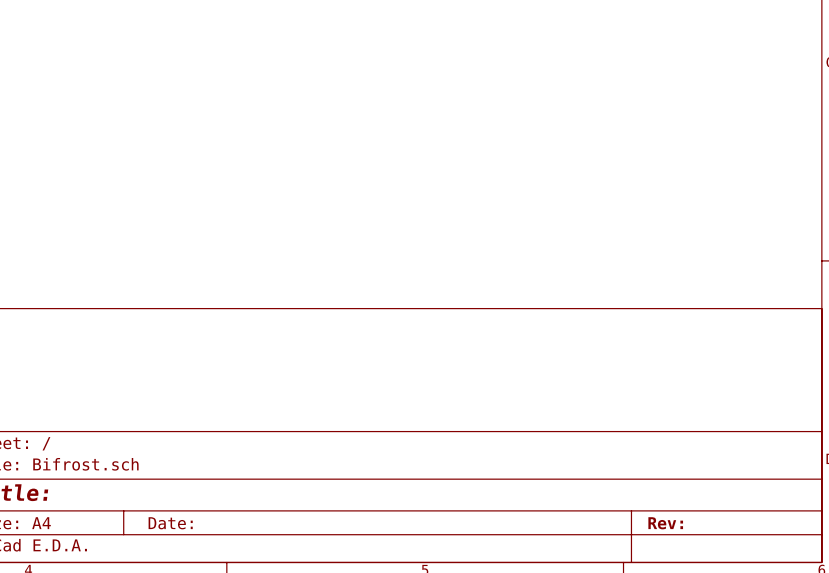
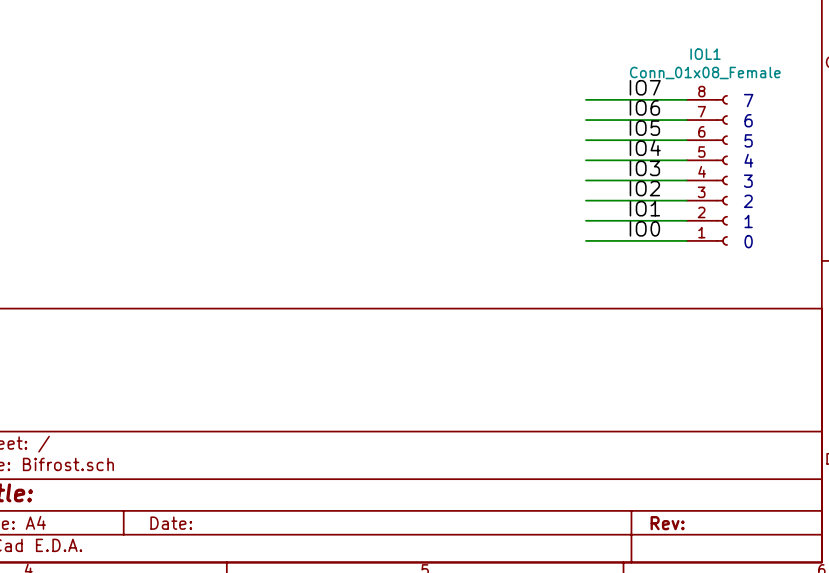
label: none -> IO7 (645, 87)
wire: none -> (585, 99) (686, 99)
text: none -> 7 (748, 100)
label: none -> IO6 (644, 107)
wire: none -> (585, 120) (686, 120)
text: none -> 6 (748, 120)
label: none -> IO5 (644, 128)
wire: none -> (585, 140) (686, 140)
text: none -> 5 (748, 140)
label: none -> IO4 (645, 147)
wire: none -> (585, 160) (686, 160)
text: none -> 4 (748, 160)
label: none -> IO3 (644, 168)
IOL1: none -> Conn_01x08_Female (707, 170)
wire: none -> (585, 180) (686, 180)
text: none -> 3 (748, 181)
label: none -> IO2 (644, 188)
wire: none -> (585, 200) (686, 200)
text: none -> 2 (748, 201)
label: none -> IO1 (644, 208)
wire: none -> (585, 220) (686, 220)
text: none -> 1 (748, 221)
label: none -> IO0 (644, 228)
wire: none -> (585, 240) (686, 240)
text: none -> 0 (748, 241)

